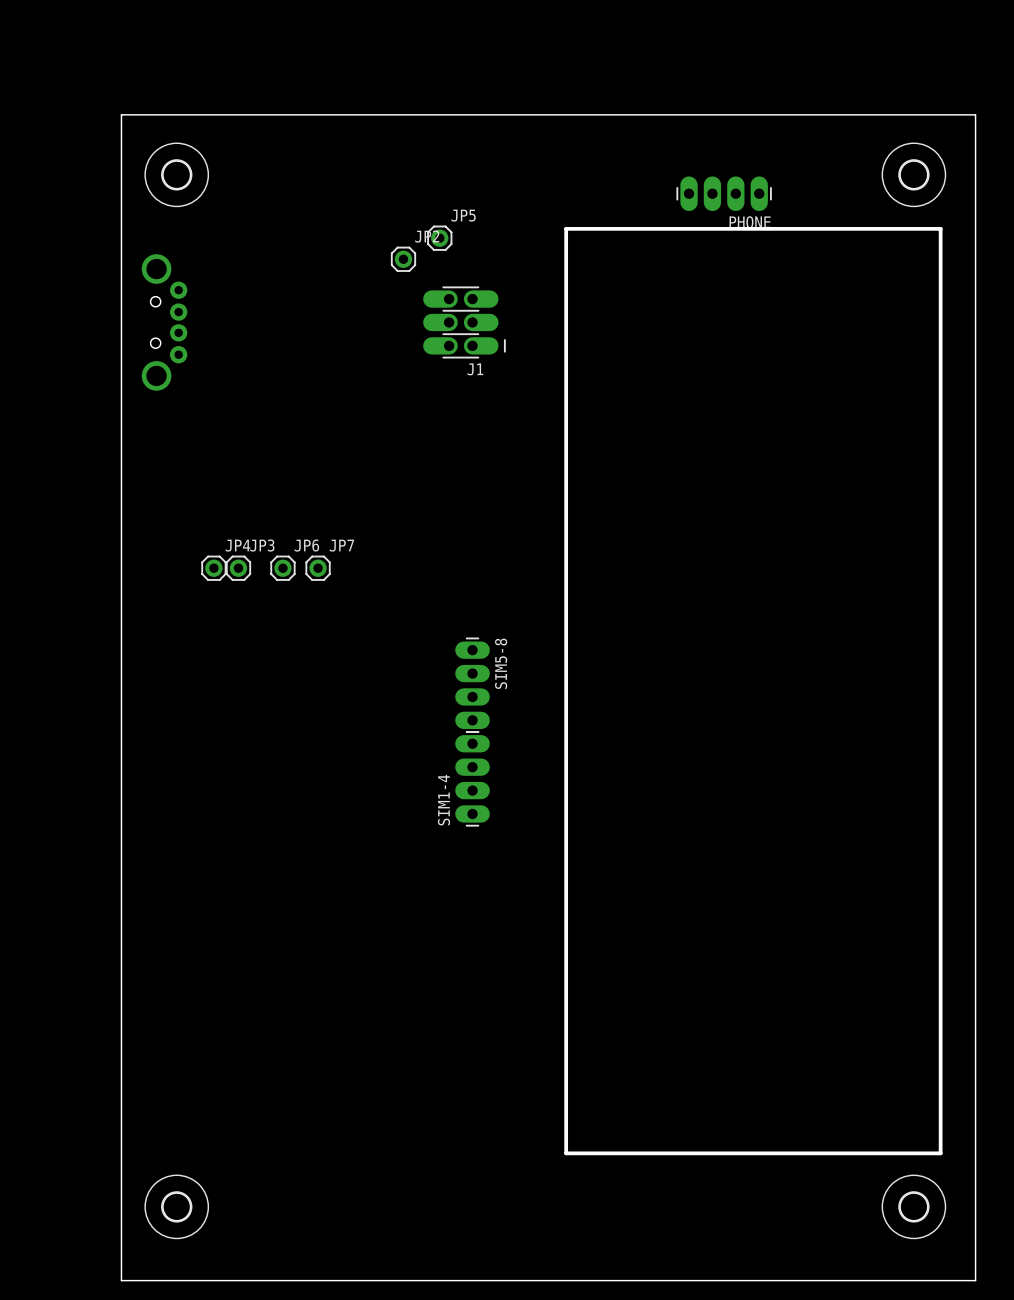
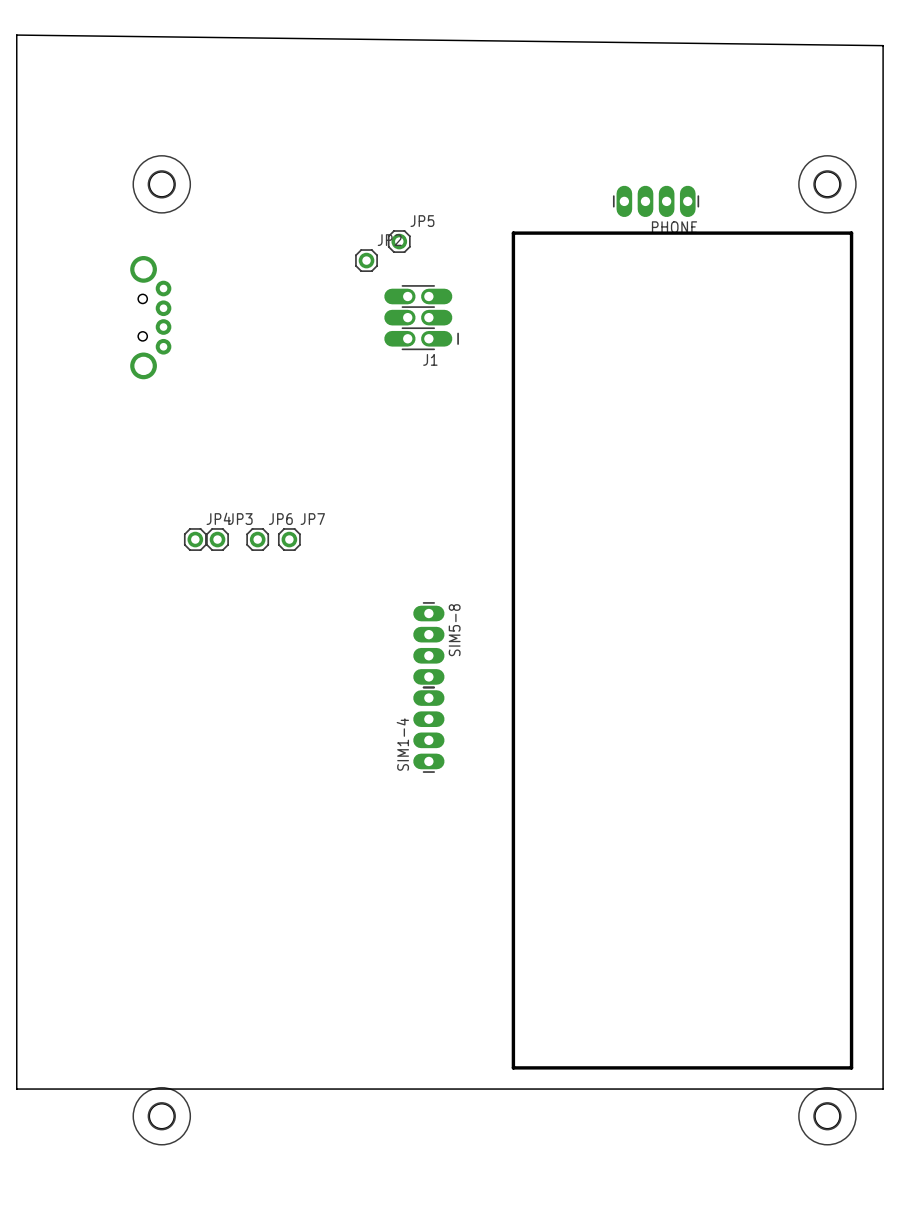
board edge: (975, 114) (121, 114) (121, 1280) (975, 1280) (975, 1176) -> (883, 130) (883, 45) (16, 35) (16, 1089) (883, 1089)

